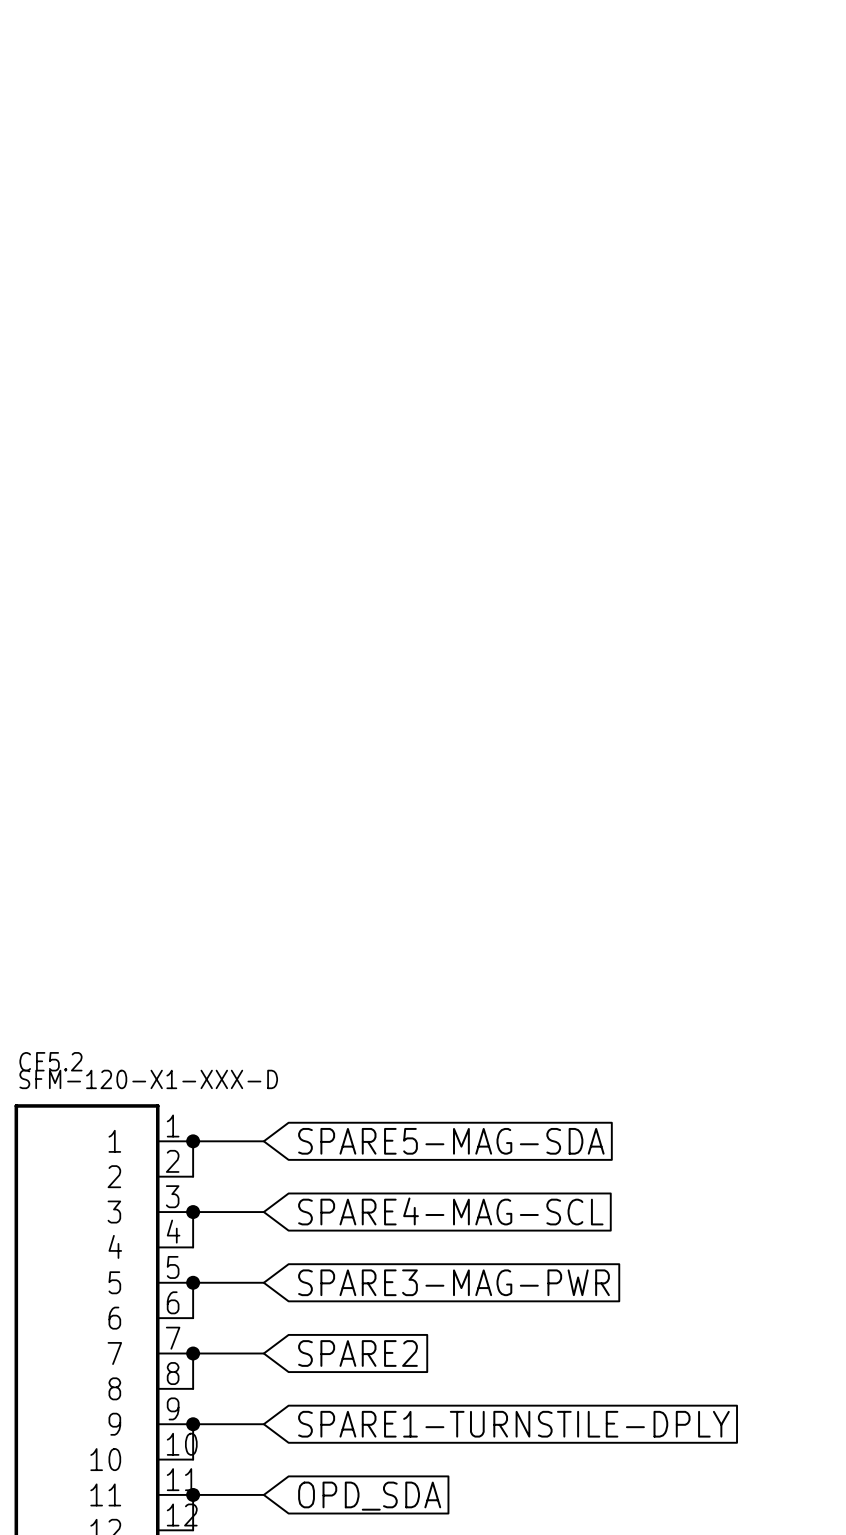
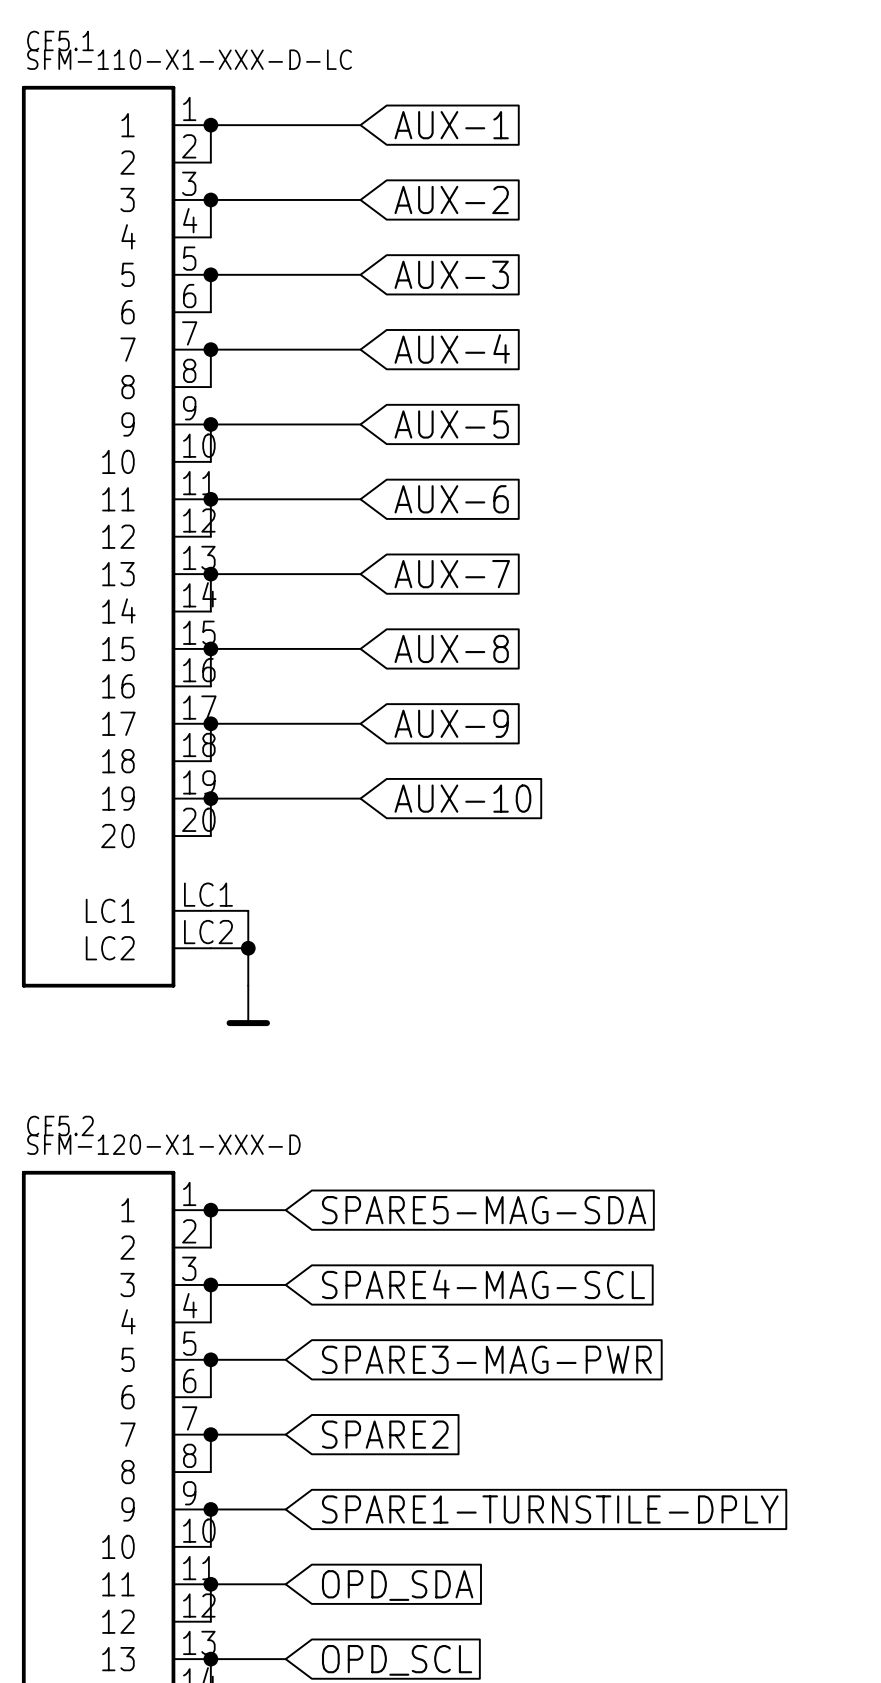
junction: none -> (210, 125)
wire: none -> (360, 125) (210, 125) (210, 162)
global label: none -> AUX-1 (451, 125)
junction: none -> (210, 199)
wire: none -> (360, 199) (210, 199) (210, 237)
global label: none -> AUX-2 (451, 199)
junction: none -> (210, 274)
wire: none -> (360, 274) (210, 274) (210, 312)
global label: none -> AUX-3 (451, 274)
junction: none -> (210, 349)
wire: none -> (360, 349) (210, 349) (210, 387)
global label: none -> AUX-4 (452, 349)
junction: none -> (210, 424)
wire: none -> (360, 424) (210, 424) (210, 461)
global label: none -> AUX-5 (451, 424)
junction: none -> (210, 499)
wire: none -> (360, 499) (210, 499) (210, 536)
global label: none -> AUX-6 (451, 499)
CF5.1: none -> SFM-110-X1-XXX-D-LC (116, 536)
junction: none -> (210, 574)
wire: none -> (360, 574) (210, 574) (210, 611)
global label: none -> AUX-7 (452, 574)
junction: none -> (210, 648)
wire: none -> (360, 648) (210, 648) (210, 686)
global label: none -> AUX-8 (451, 648)
junction: none -> (210, 723)
wire: none -> (360, 723) (210, 723) (210, 761)
global label: none -> AUX-9 (451, 723)
junction: none -> (210, 798)
wire: none -> (360, 798) (210, 798) (210, 836)
global label: none -> AUX-10 (462, 798)
wire: none -> (210, 910) (248, 910) (248, 985)
wire: none -> (210, 948) (248, 948)
junction: none -> (248, 948)
power symbol: none -> (248, 1005)

